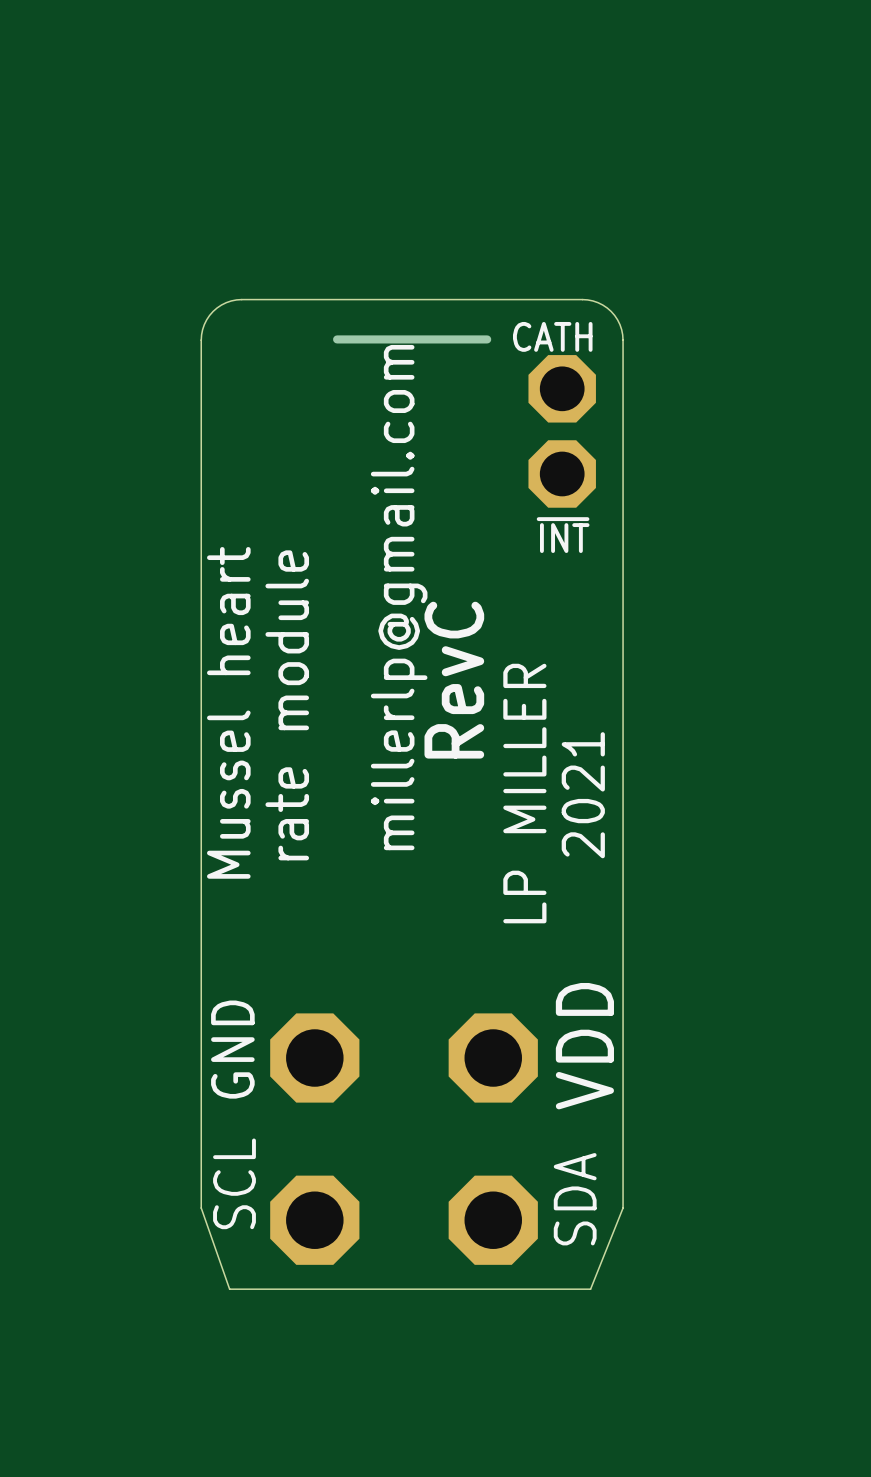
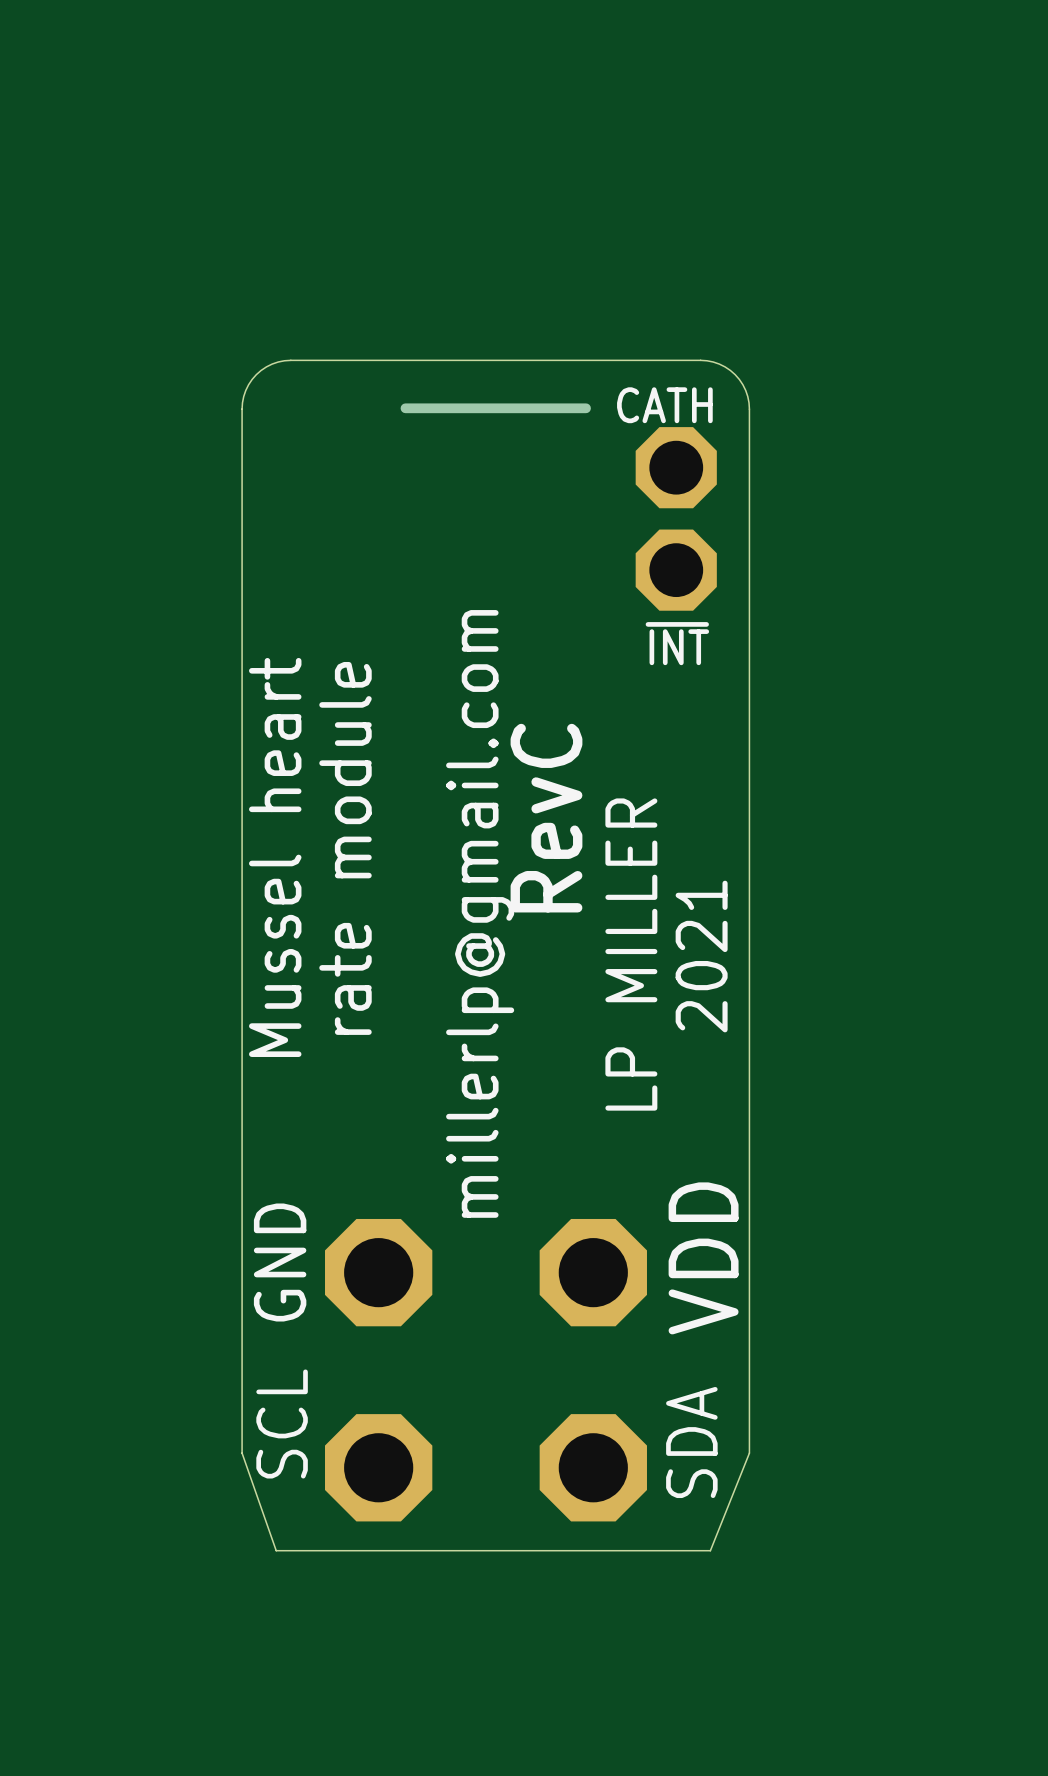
text position: millerlp@gmail.com (399, 597) -> millerlp@gmail.com (480, 913)

